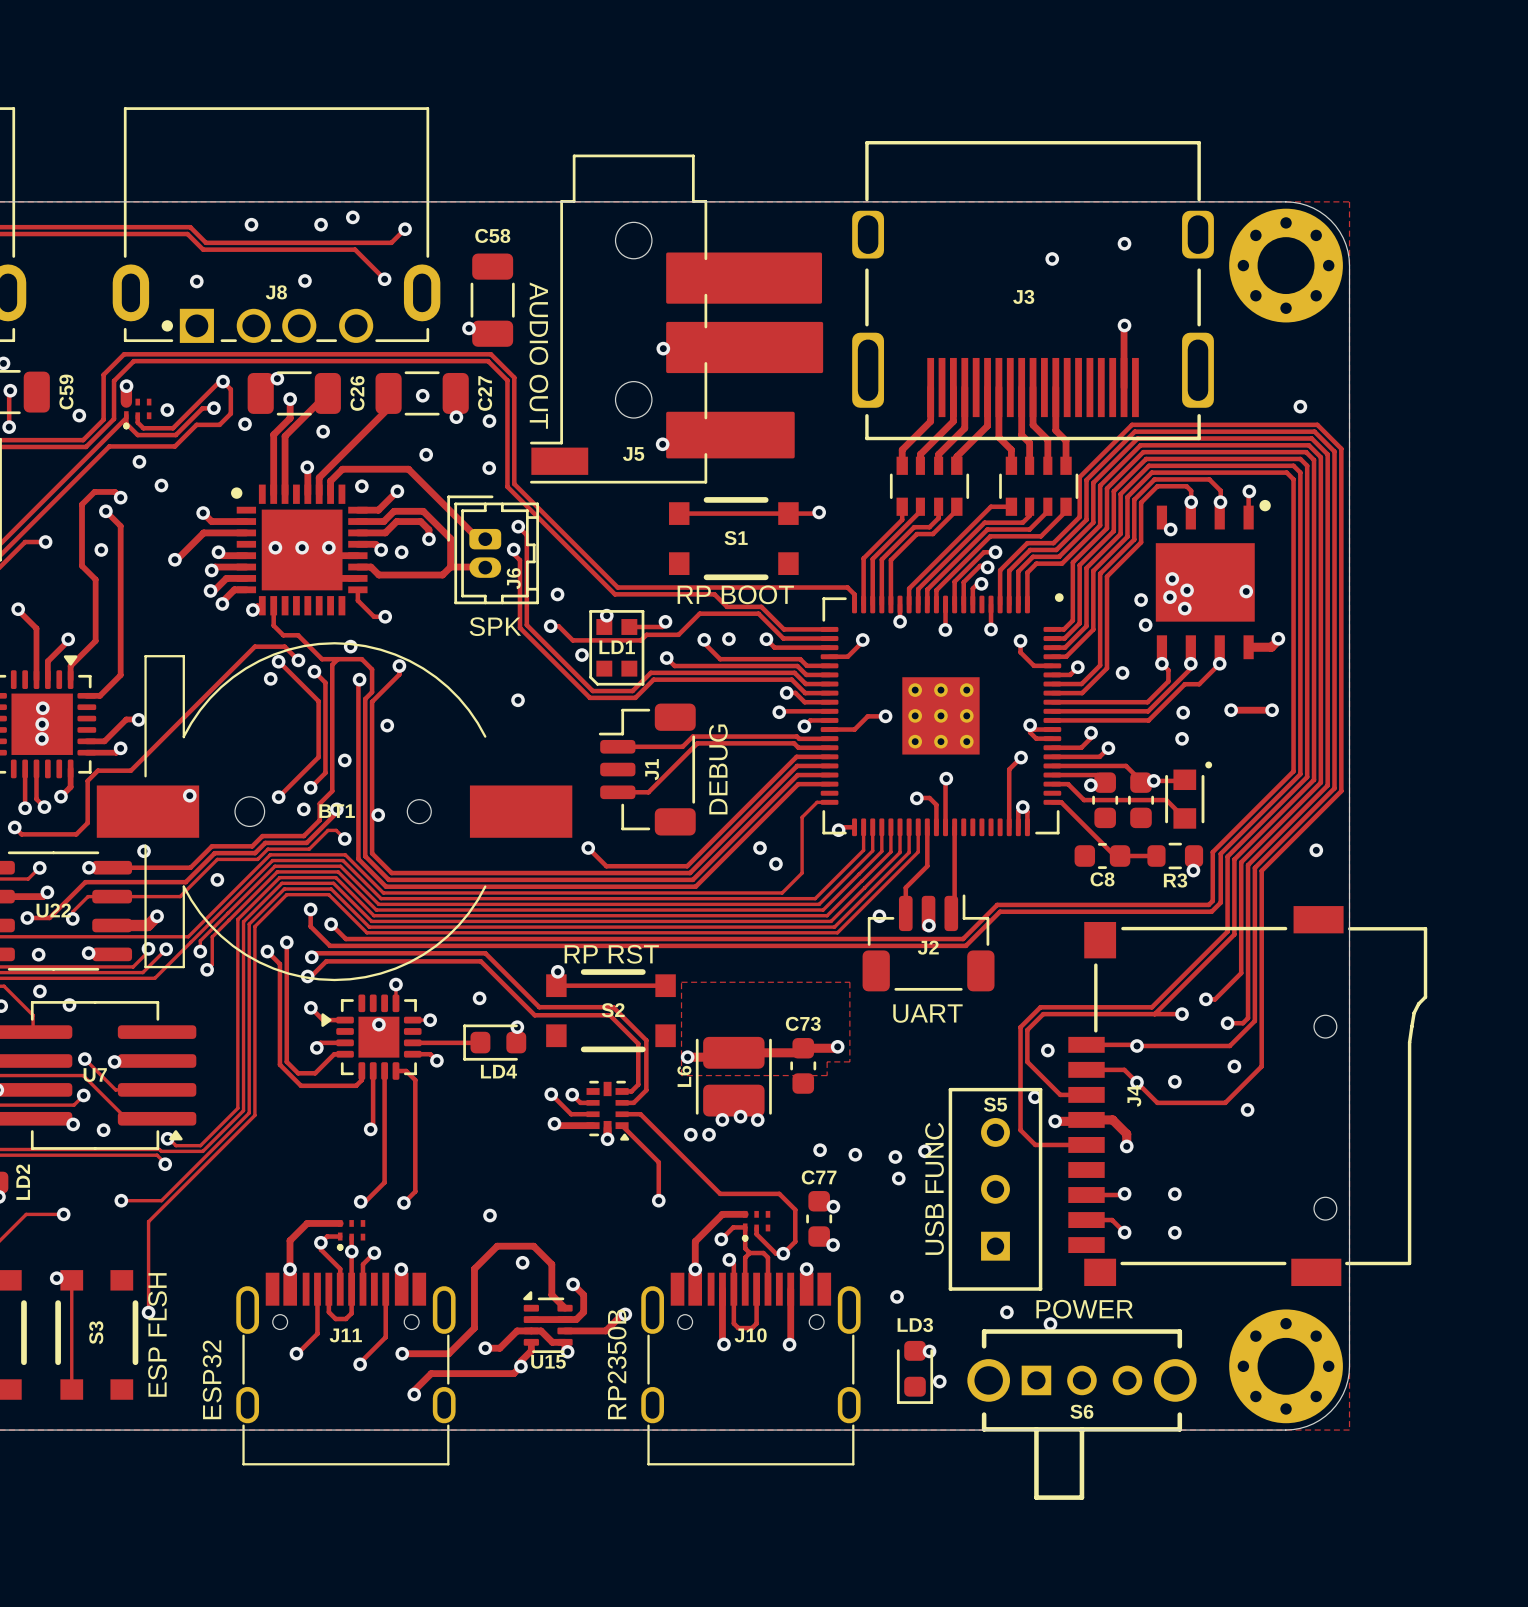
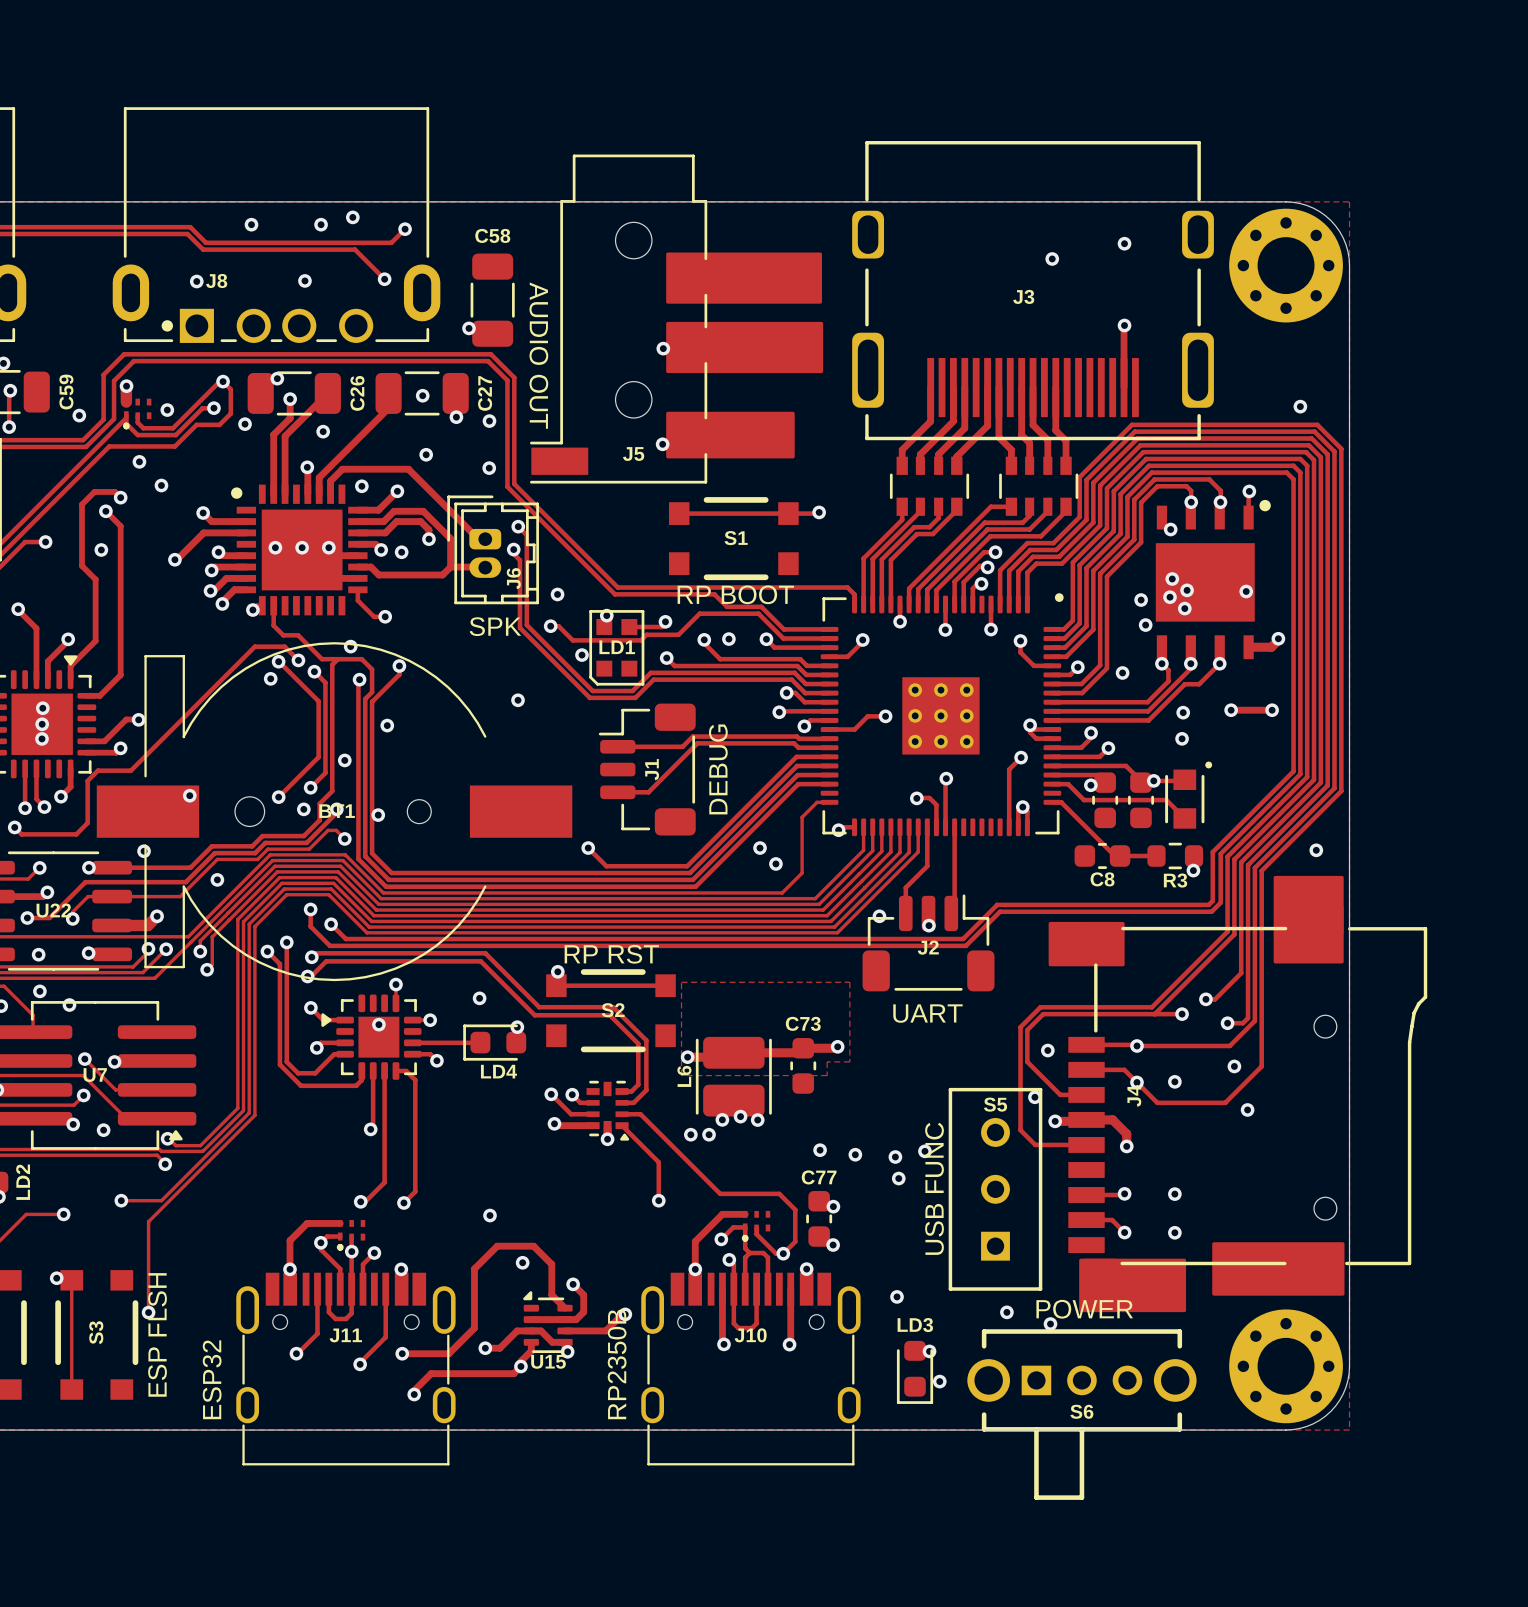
J8 name position: J8 (276, 292) -> J8 (216, 280)
drawing: none -> [1273, 875, 1344, 964]
drawing: none -> [1048, 921, 1125, 967]
drawing: none -> [1079, 1242, 1345, 1313]

